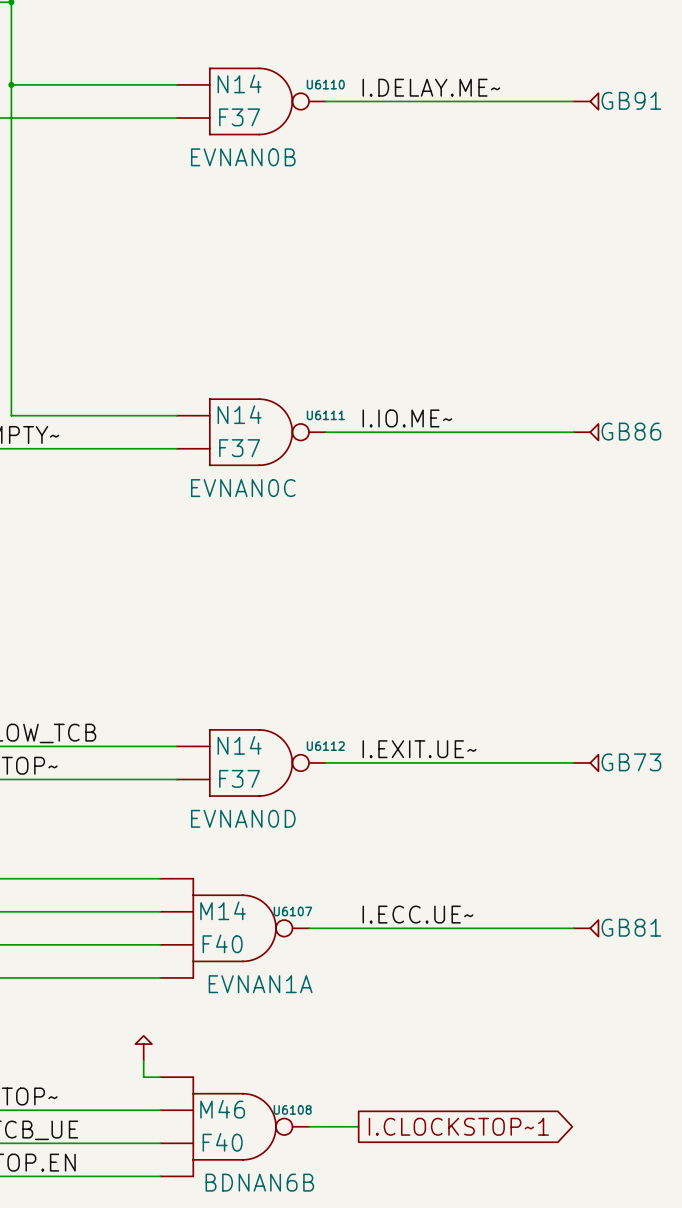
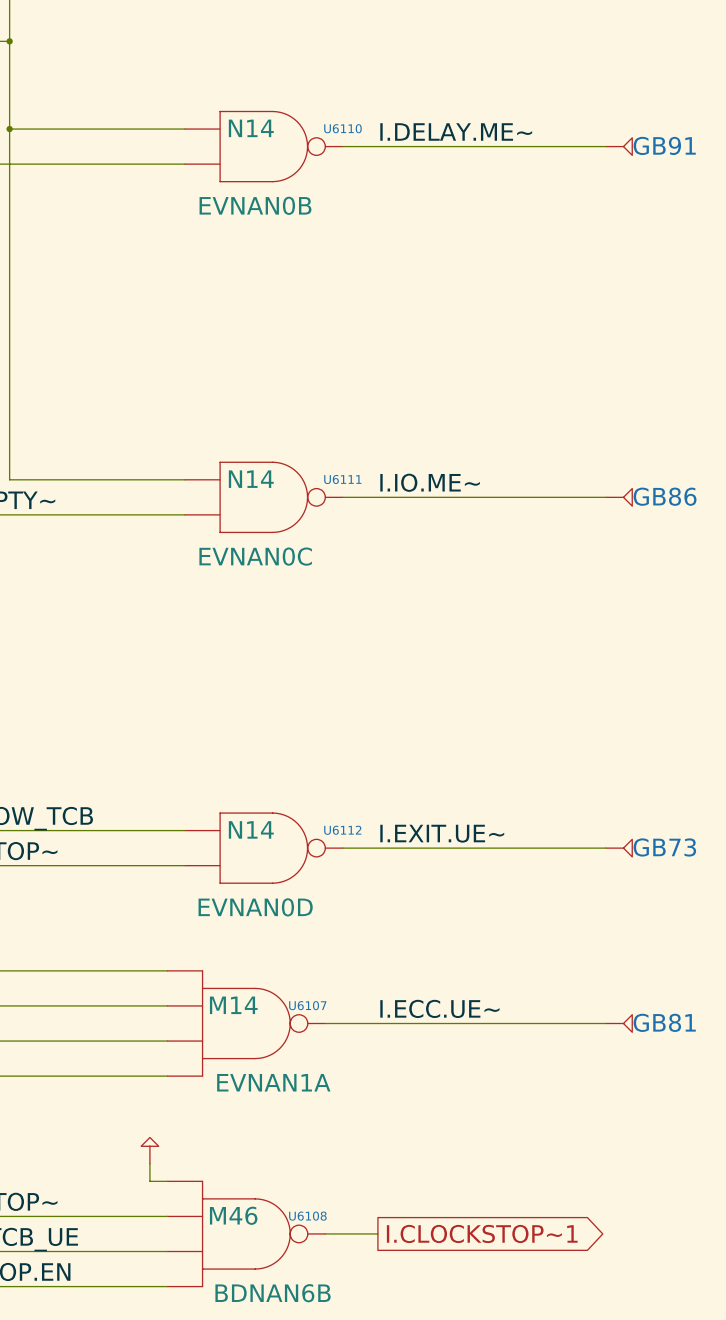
U6110 value: F37 (239, 117) -> none
U6111 value: F37 (239, 448) -> none
U6112 value: F37 (239, 778) -> none
U6107 value: F40 (222, 943) -> none
U6108 value: F40 (222, 1142) -> none

